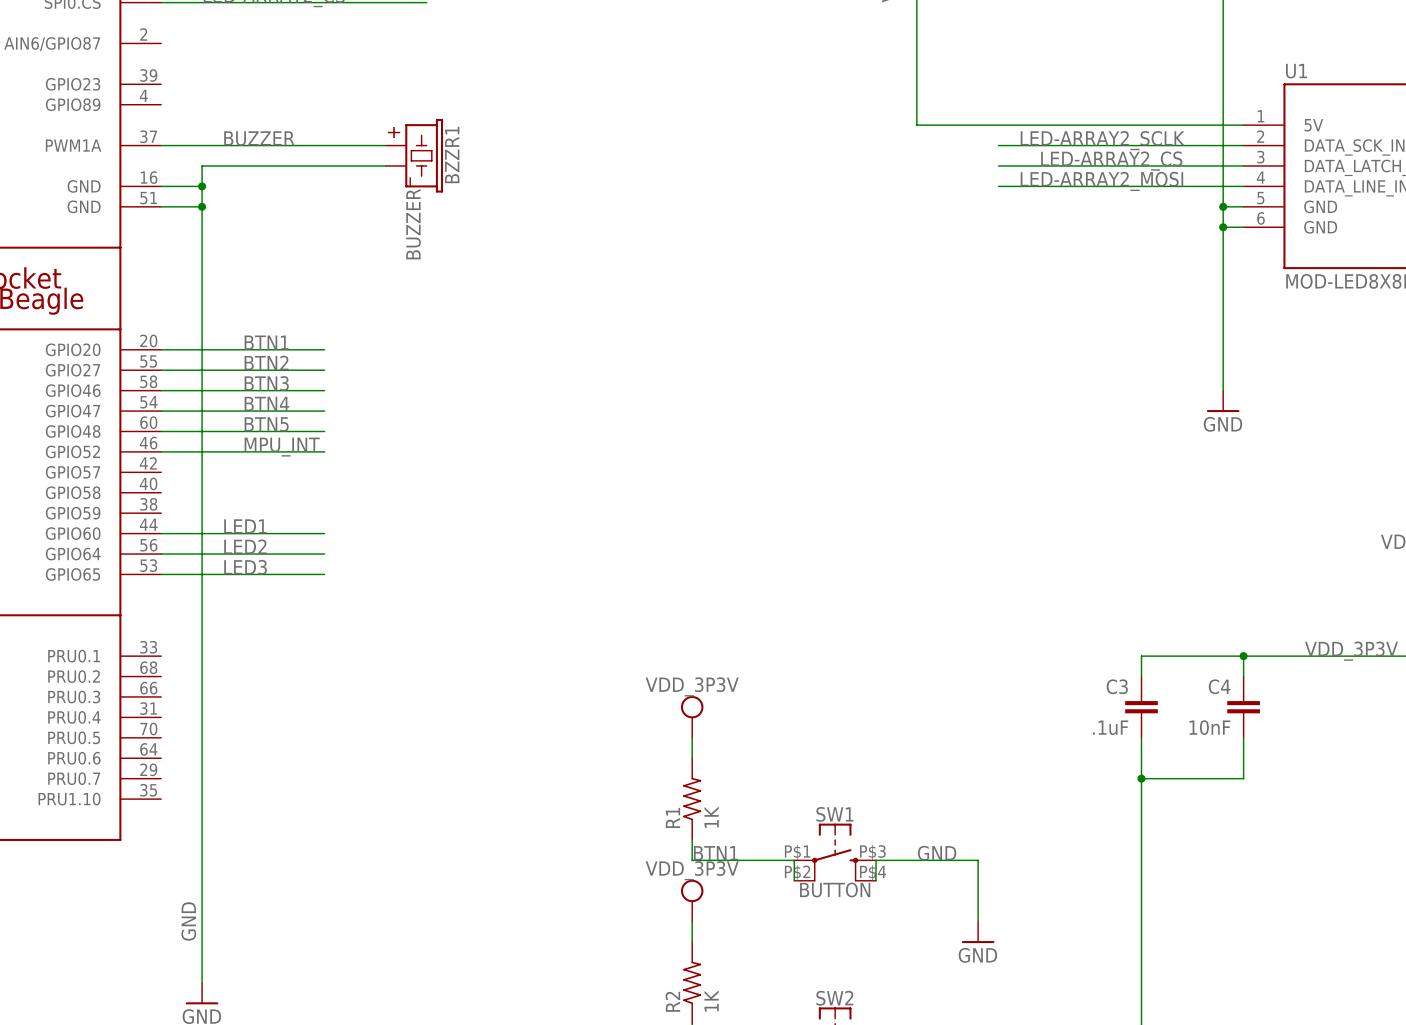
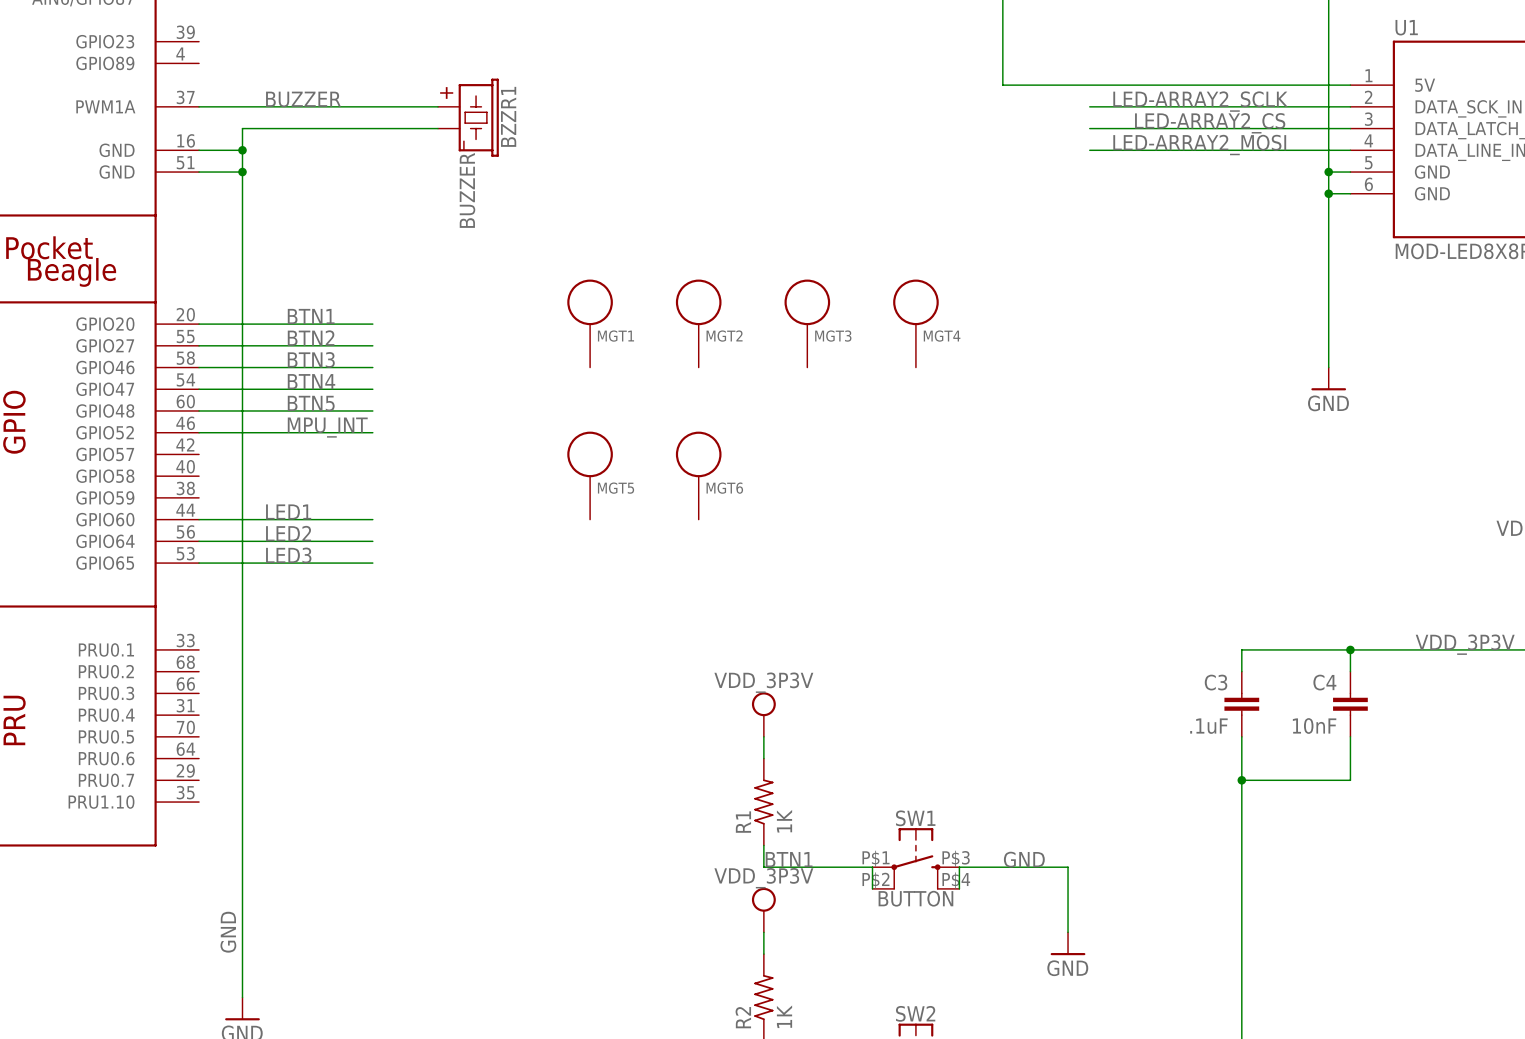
MGT1: none -> (590, 323)
MGT2: none -> (698, 323)
MGT3: none -> (807, 323)
MGT4: none -> (915, 323)
MGT5: none -> (590, 475)
MGT6: none -> (698, 475)

